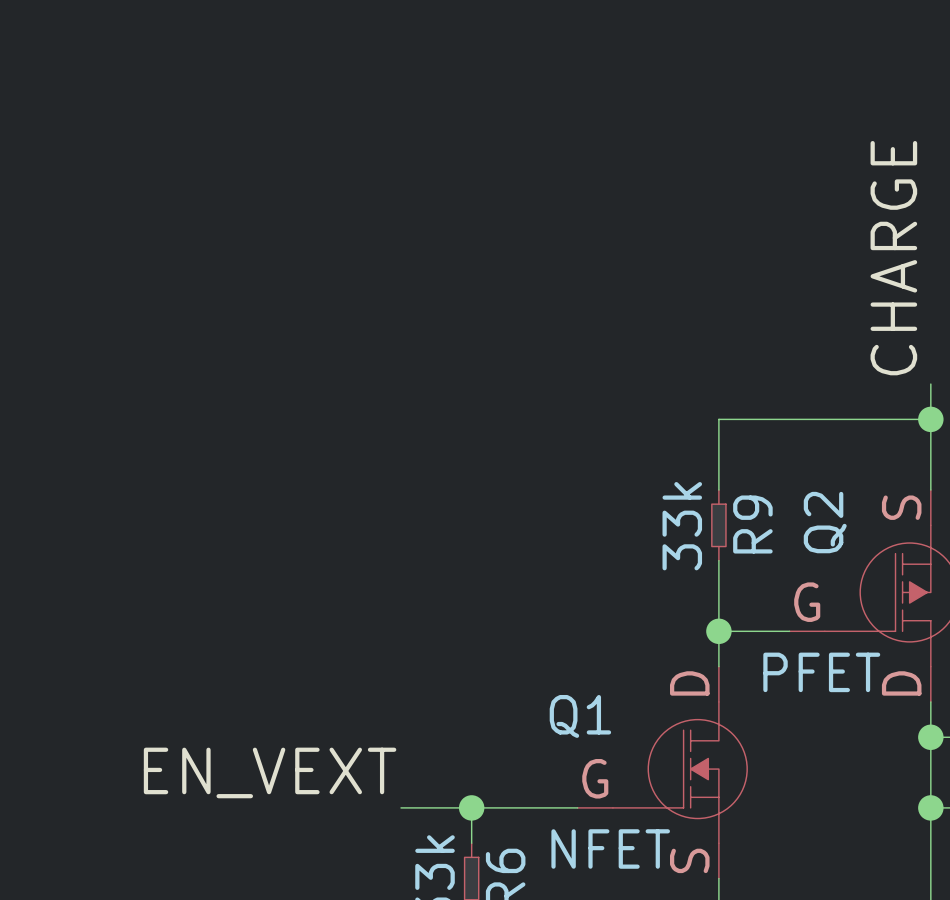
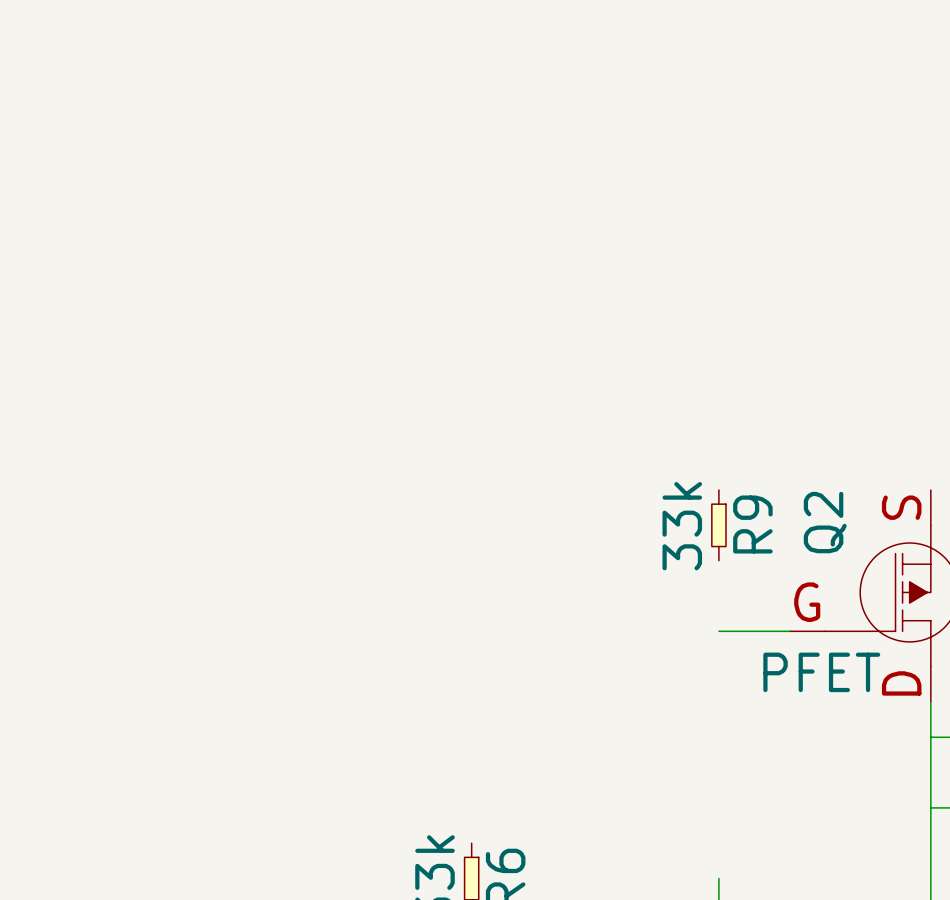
label: CHARGE (893, 258) -> none
wire: (930, 384) (930, 490) -> none
wire: (930, 419) (718, 419) (718, 490) -> none
junction: (930, 419) -> none
wire: (718, 560) (718, 666) -> none
junction: (718, 631) -> none
junction: (930, 737) -> none
label: EN_VEXT (270, 772) -> none
Q1: NFET (662, 772) -> none
wire: (401, 807) (577, 807) -> none
wire: (471, 807) (471, 843) -> none
junction: (471, 807) -> none
junction: (930, 807) -> none

